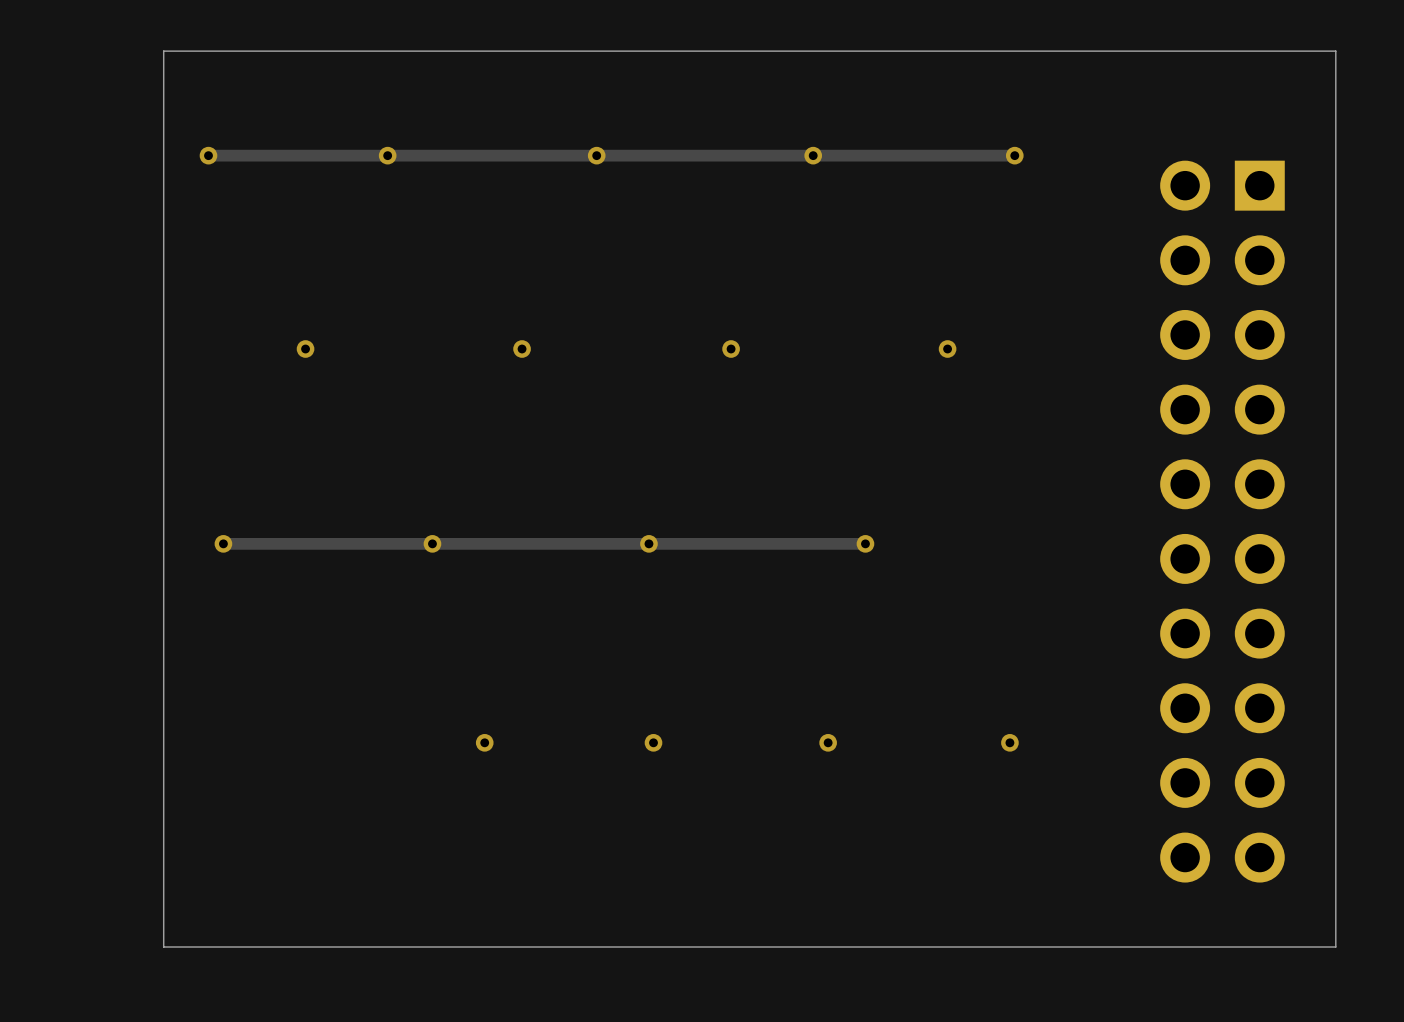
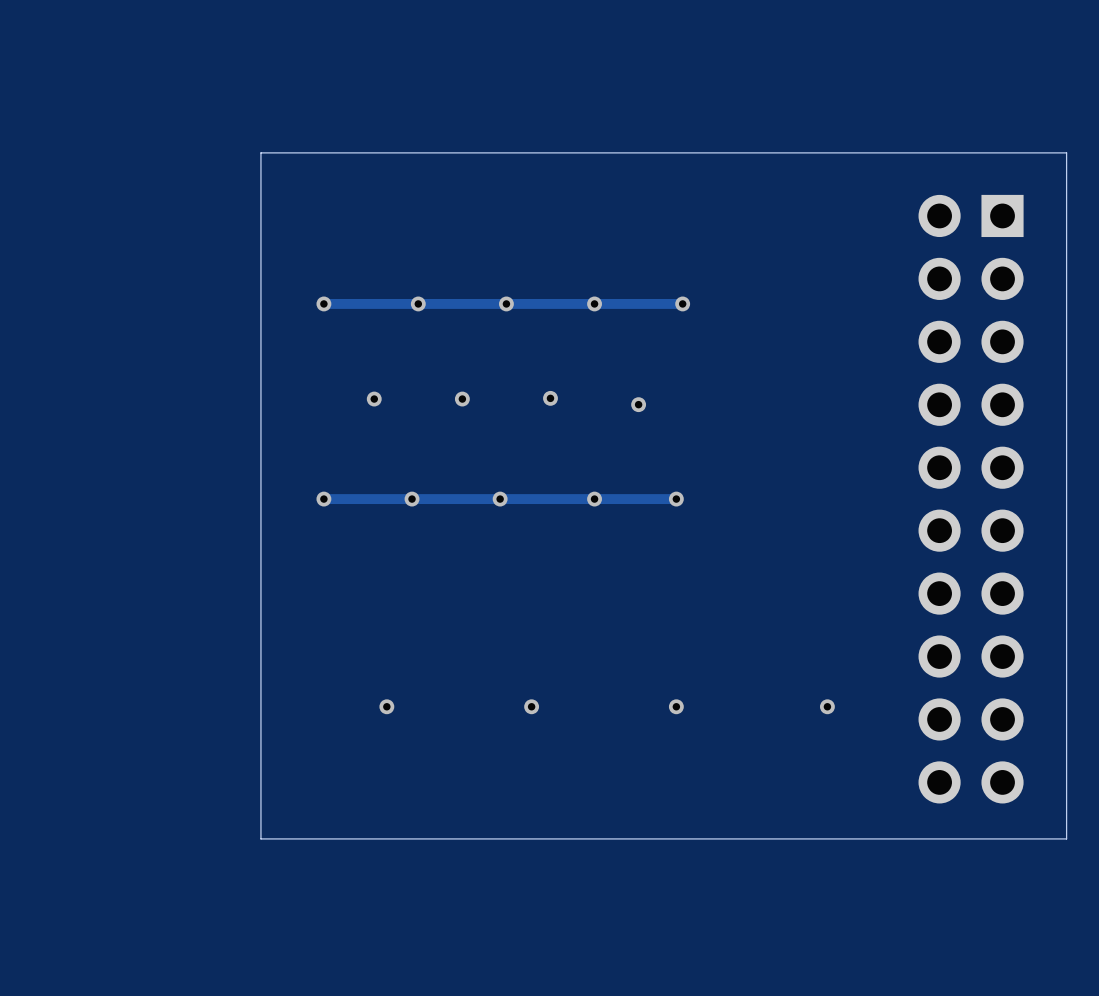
board edge: (1335, 110) (1335, 51) (163, 51) (163, 947) (1335, 947) (1335, 924) -> (1066, 152) (260, 152) (260, 838) (1066, 838)
via: (208, 155) -> none
via: (387, 155) -> none
via: (596, 155) -> none
via: (813, 155) -> none
track: (1014, 155) (208, 155) -> none
via: (1014, 155) -> none
via: none -> (323, 303)
via: none -> (418, 303)
via: none -> (506, 303)
via: none -> (594, 303)
track: none -> (682, 303) (323, 303)
via: none -> (682, 303)
via: (305, 349) -> none
via: (522, 349) -> none
via: (731, 349) -> none
via: (947, 349) -> none
via: none -> (374, 399)
via: none -> (462, 399)
via: none -> (550, 398)
via: none -> (638, 404)
via: none -> (412, 499)
via: none -> (594, 499)
track: none -> (676, 499) (323, 499)
via: (223, 543) -> none
via position: (432, 543) -> (323, 499)
via position: (648, 543) -> (500, 499)
track: (865, 543) (223, 543) -> none
via position: (865, 543) -> (676, 499)
via position: (484, 742) -> (386, 706)
via position: (653, 742) -> (531, 706)
via position: (828, 742) -> (676, 706)
via position: (1009, 742) -> (827, 706)

